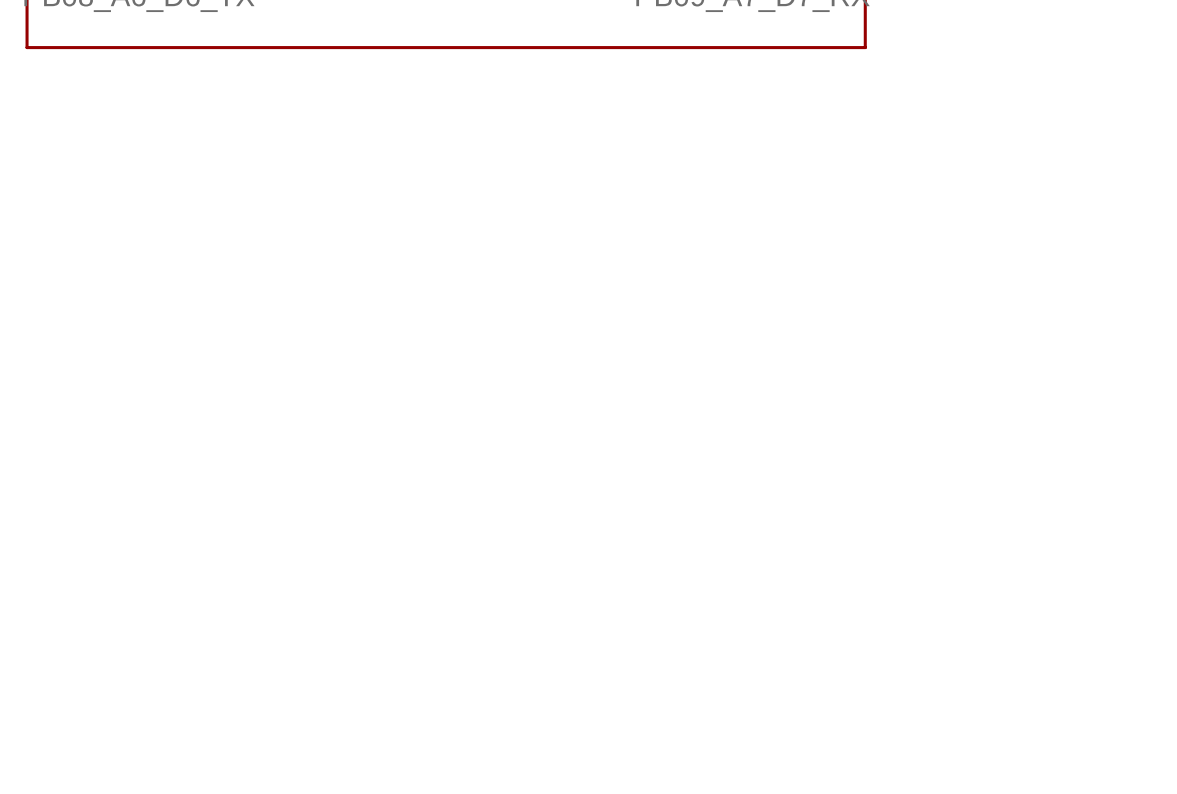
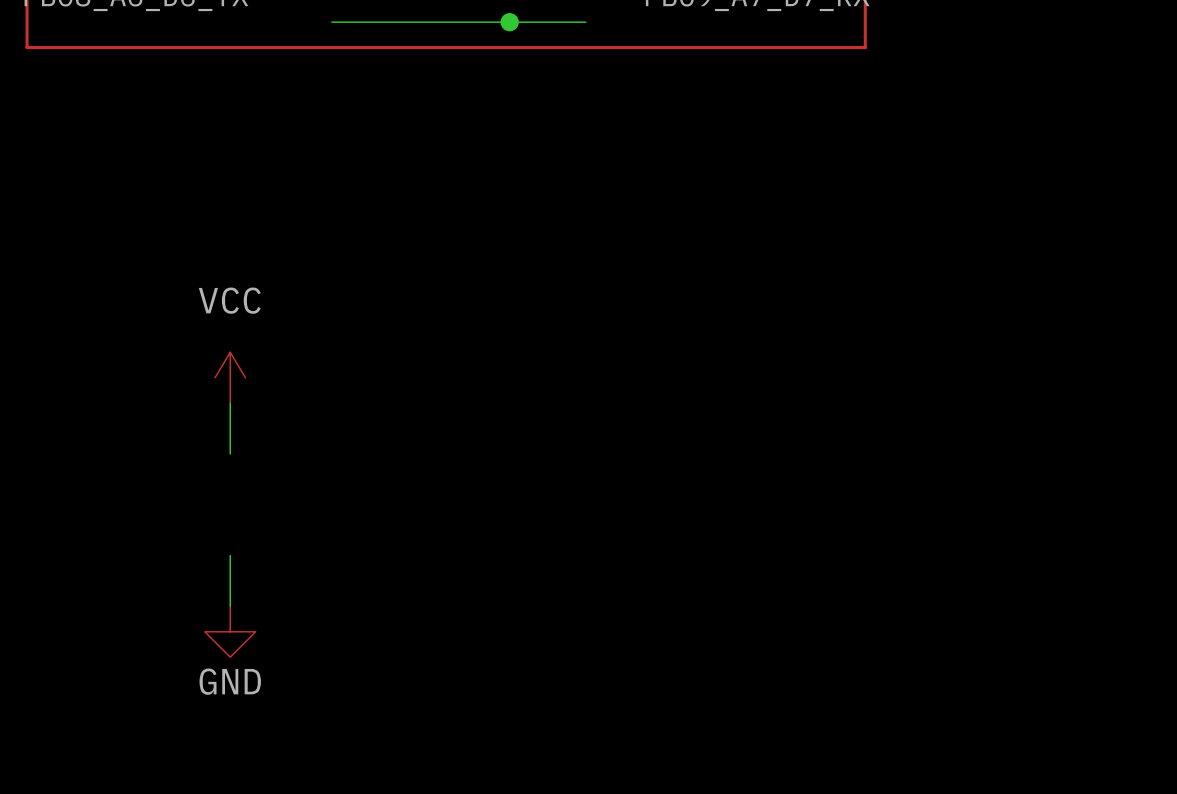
wire: none -> (331, 22) (585, 22)
junction: none -> (509, 22)
power symbol: none -> VCC (230, 377)
wire: none -> (230, 403) (230, 454)
wire: none -> (230, 555) (230, 606)
power symbol: none -> GND (230, 631)

